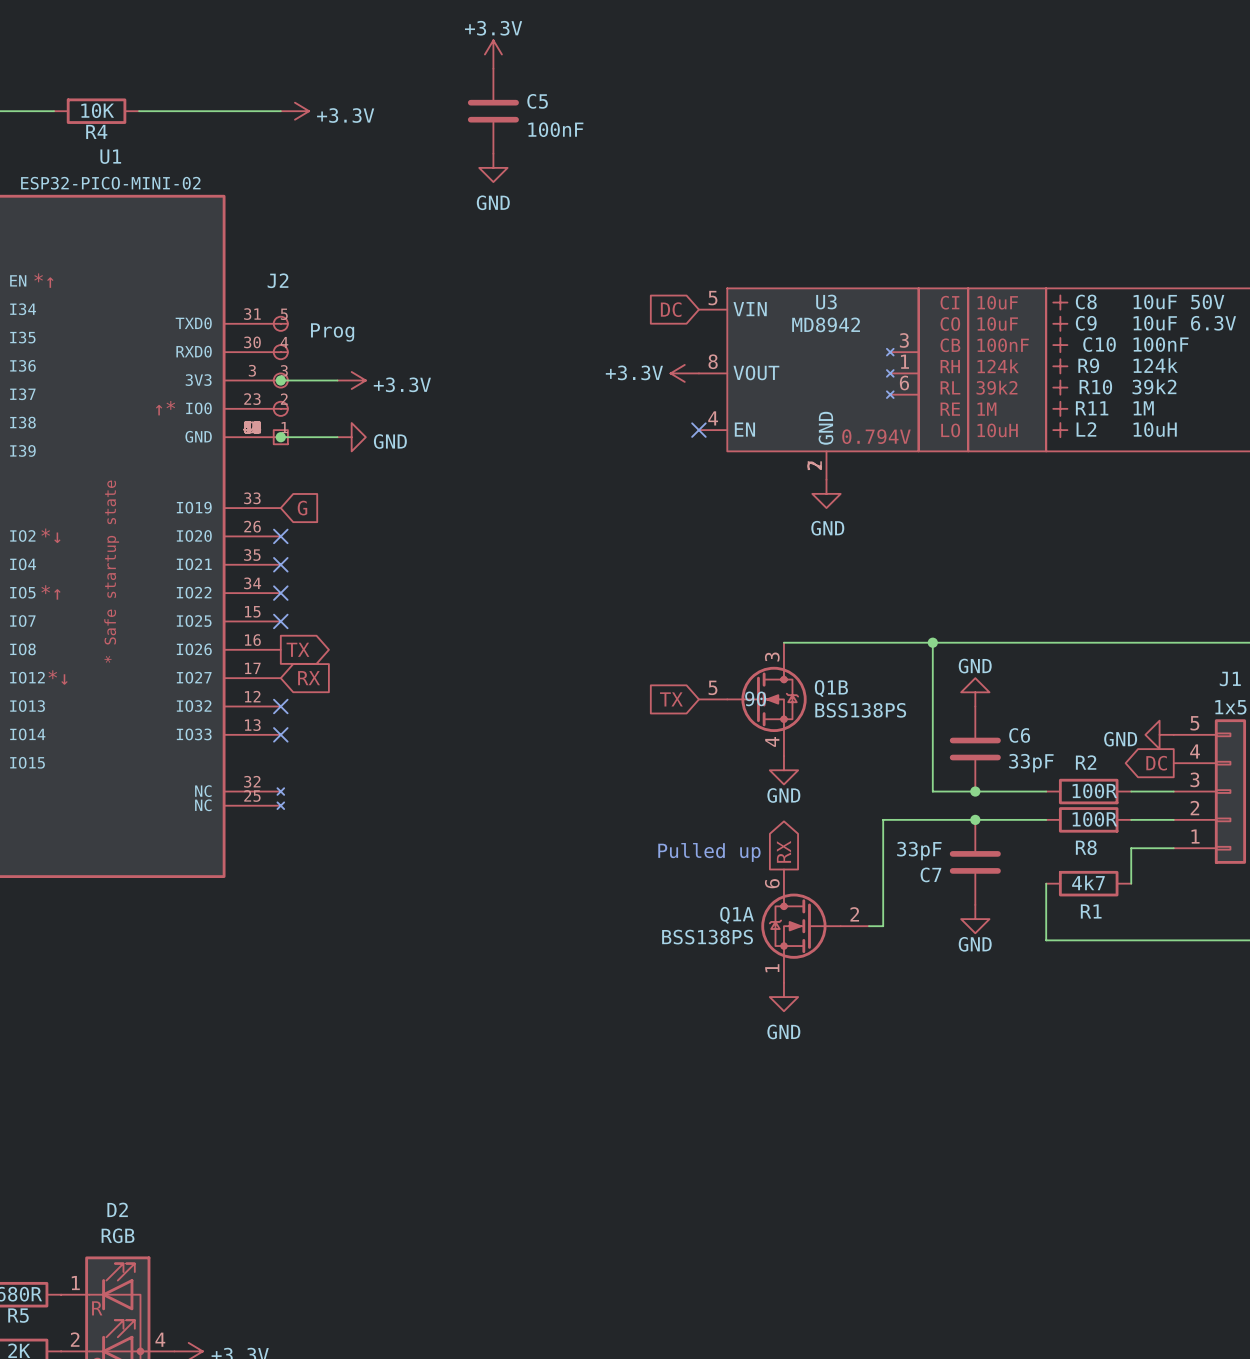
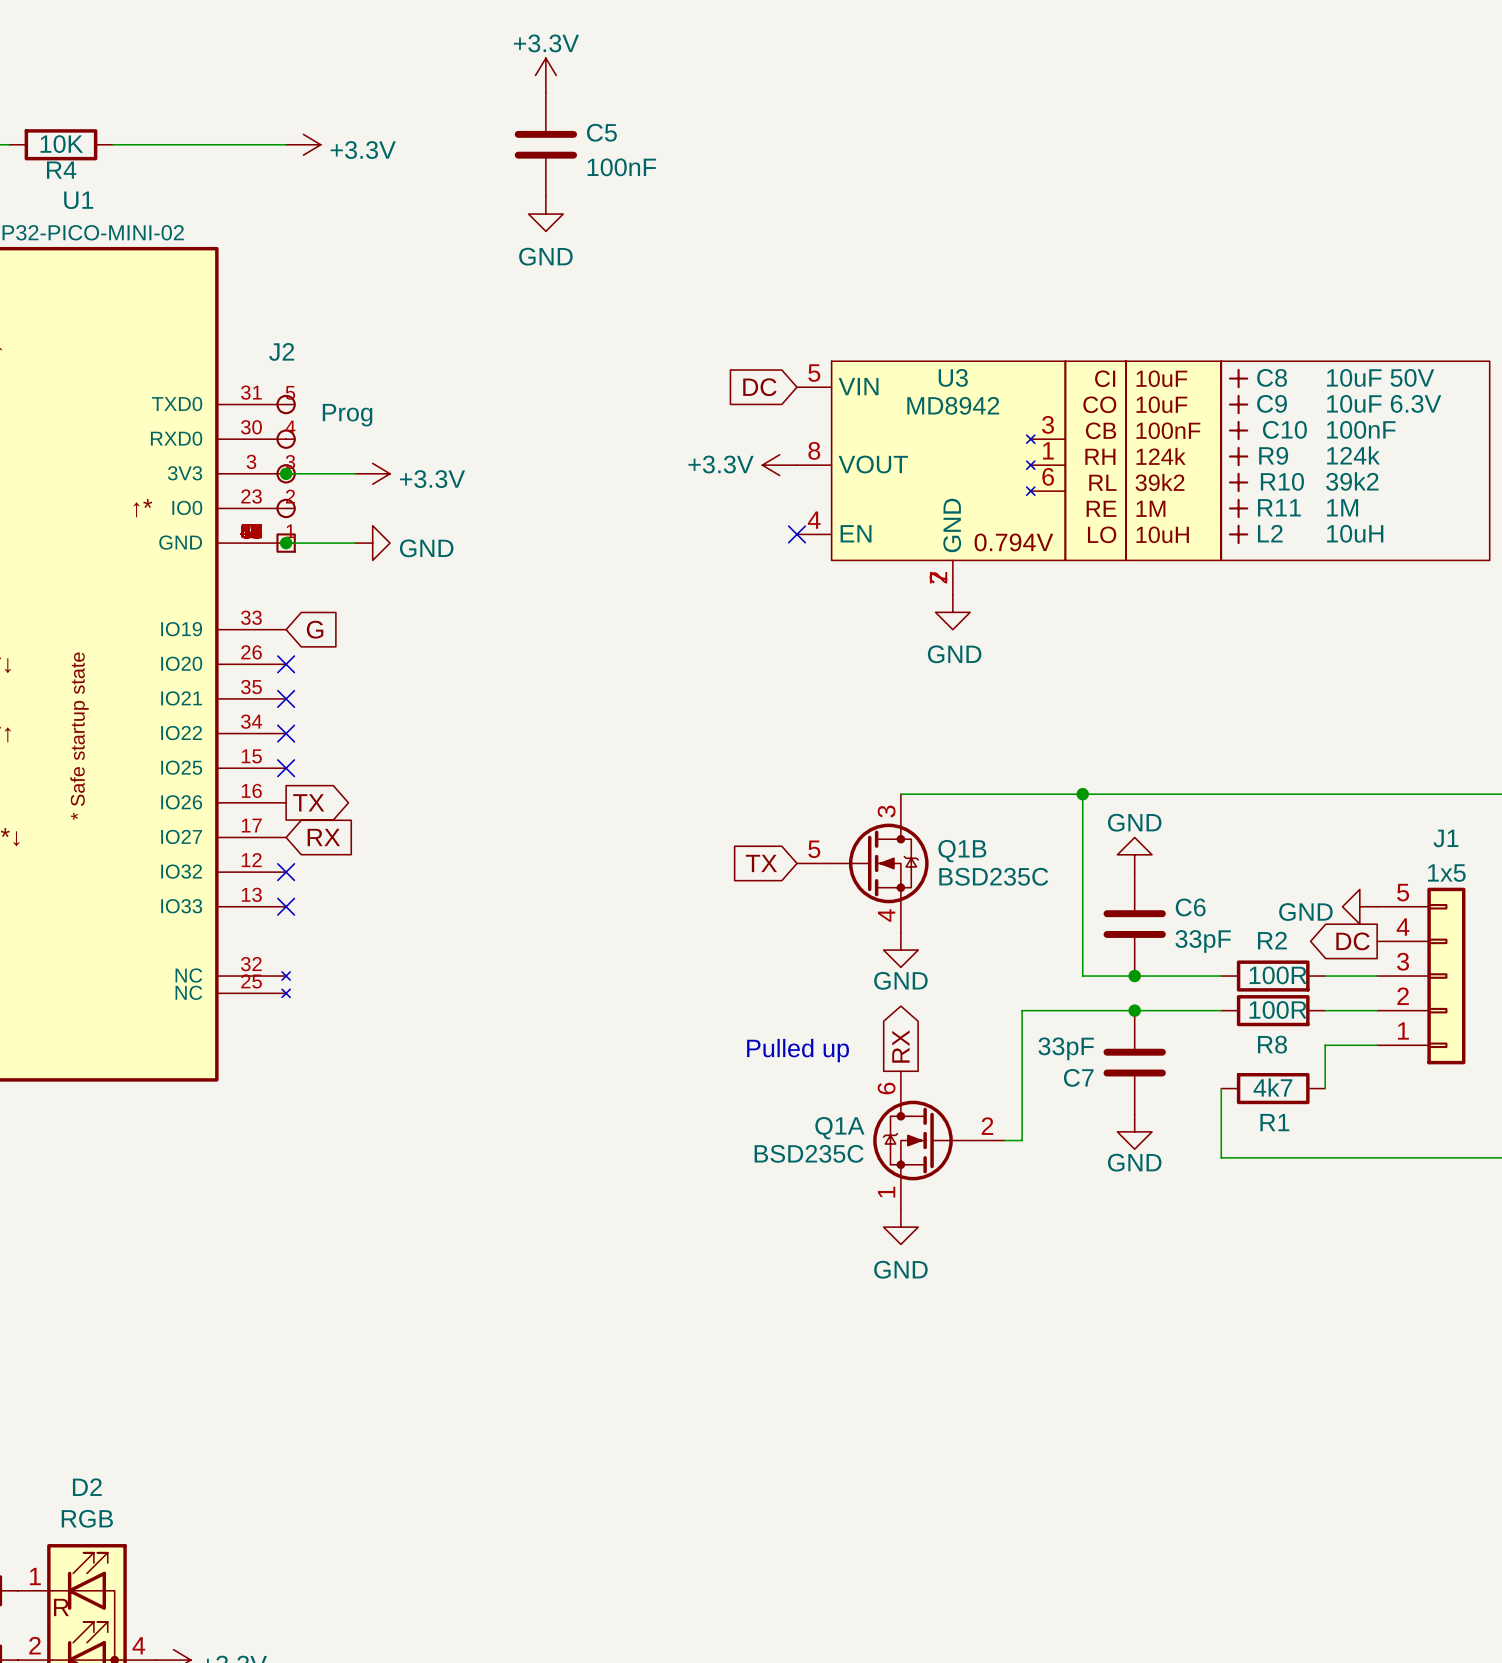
Q1B text: 90 (755, 698) -> none
Q1B value: BSS138PS (860, 710) -> BSD235C (993, 876)
Q1A value: BSS138PS (707, 937) -> BSD235C (809, 1153)

